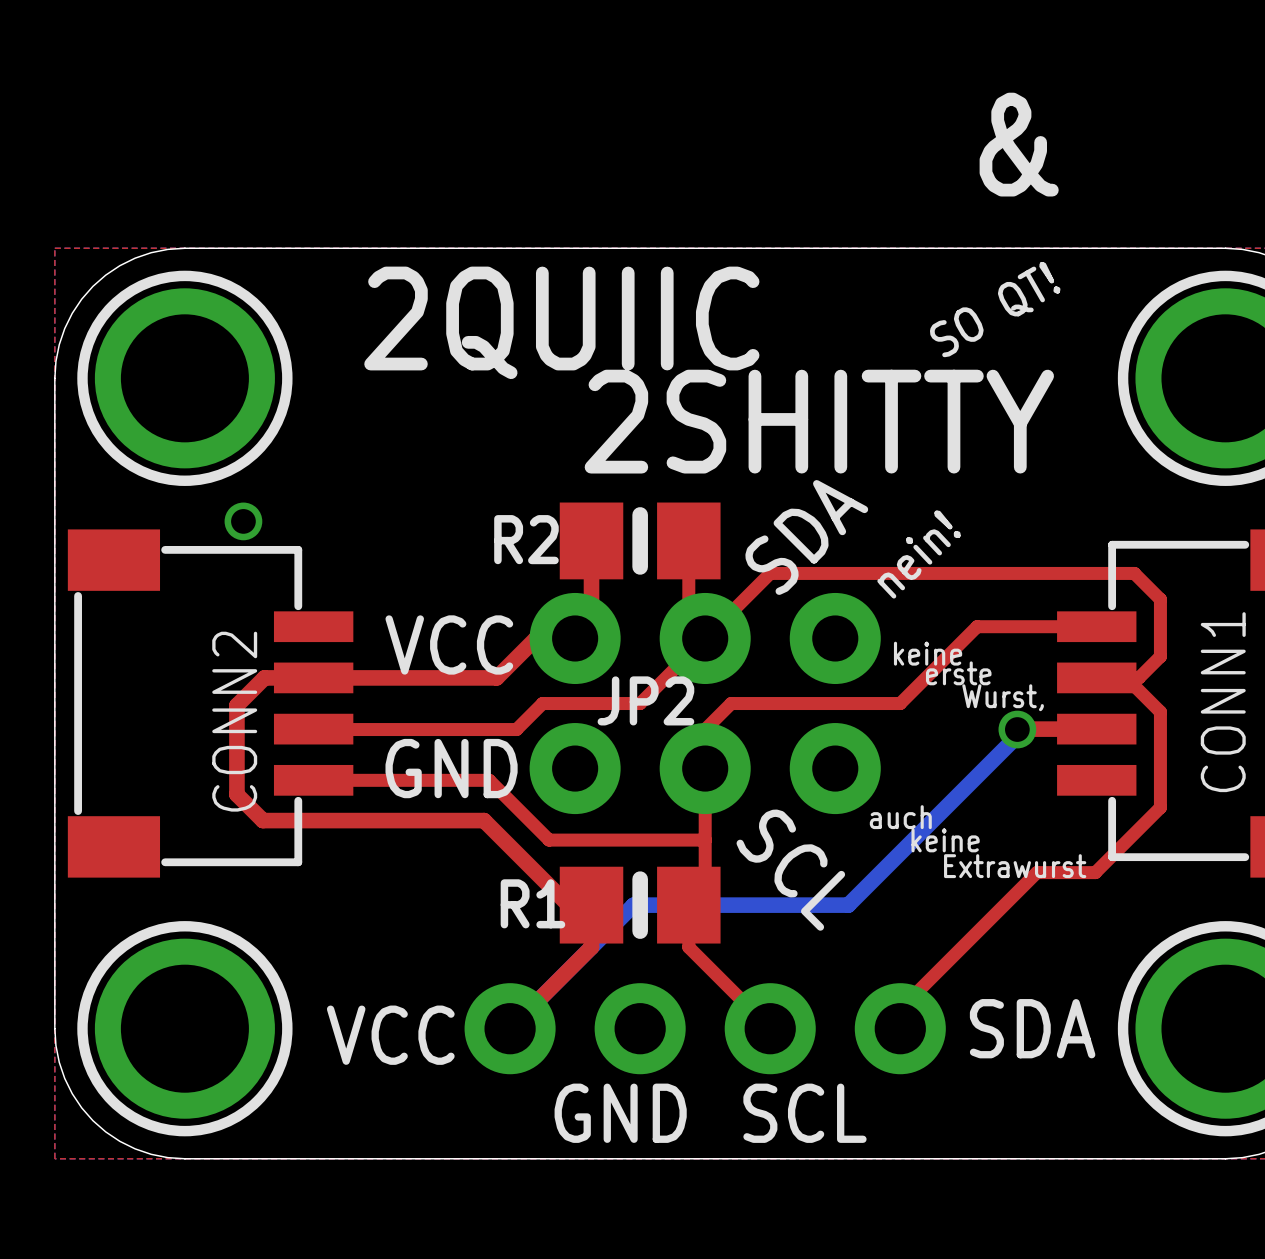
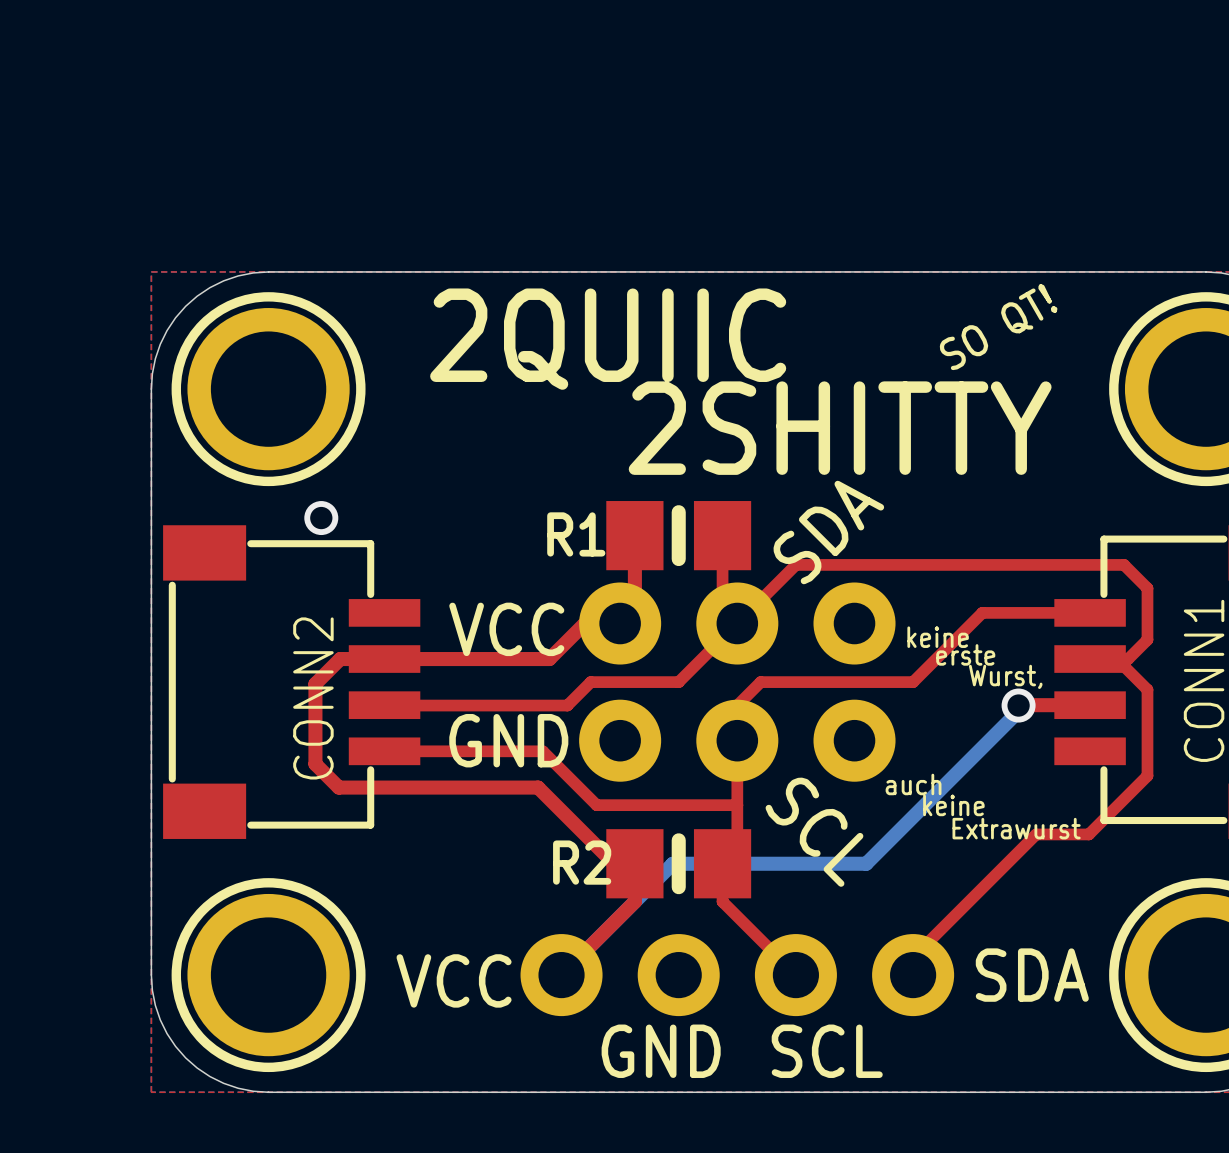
text: & (1019, 144) -> none
R2 name: R2 (526, 539) -> R1 (576, 534)
text: nein! (918, 554) -> none
JP2 name: JP2 (645, 700) -> none
R1 name: R1 (532, 903) -> R2 (582, 862)

